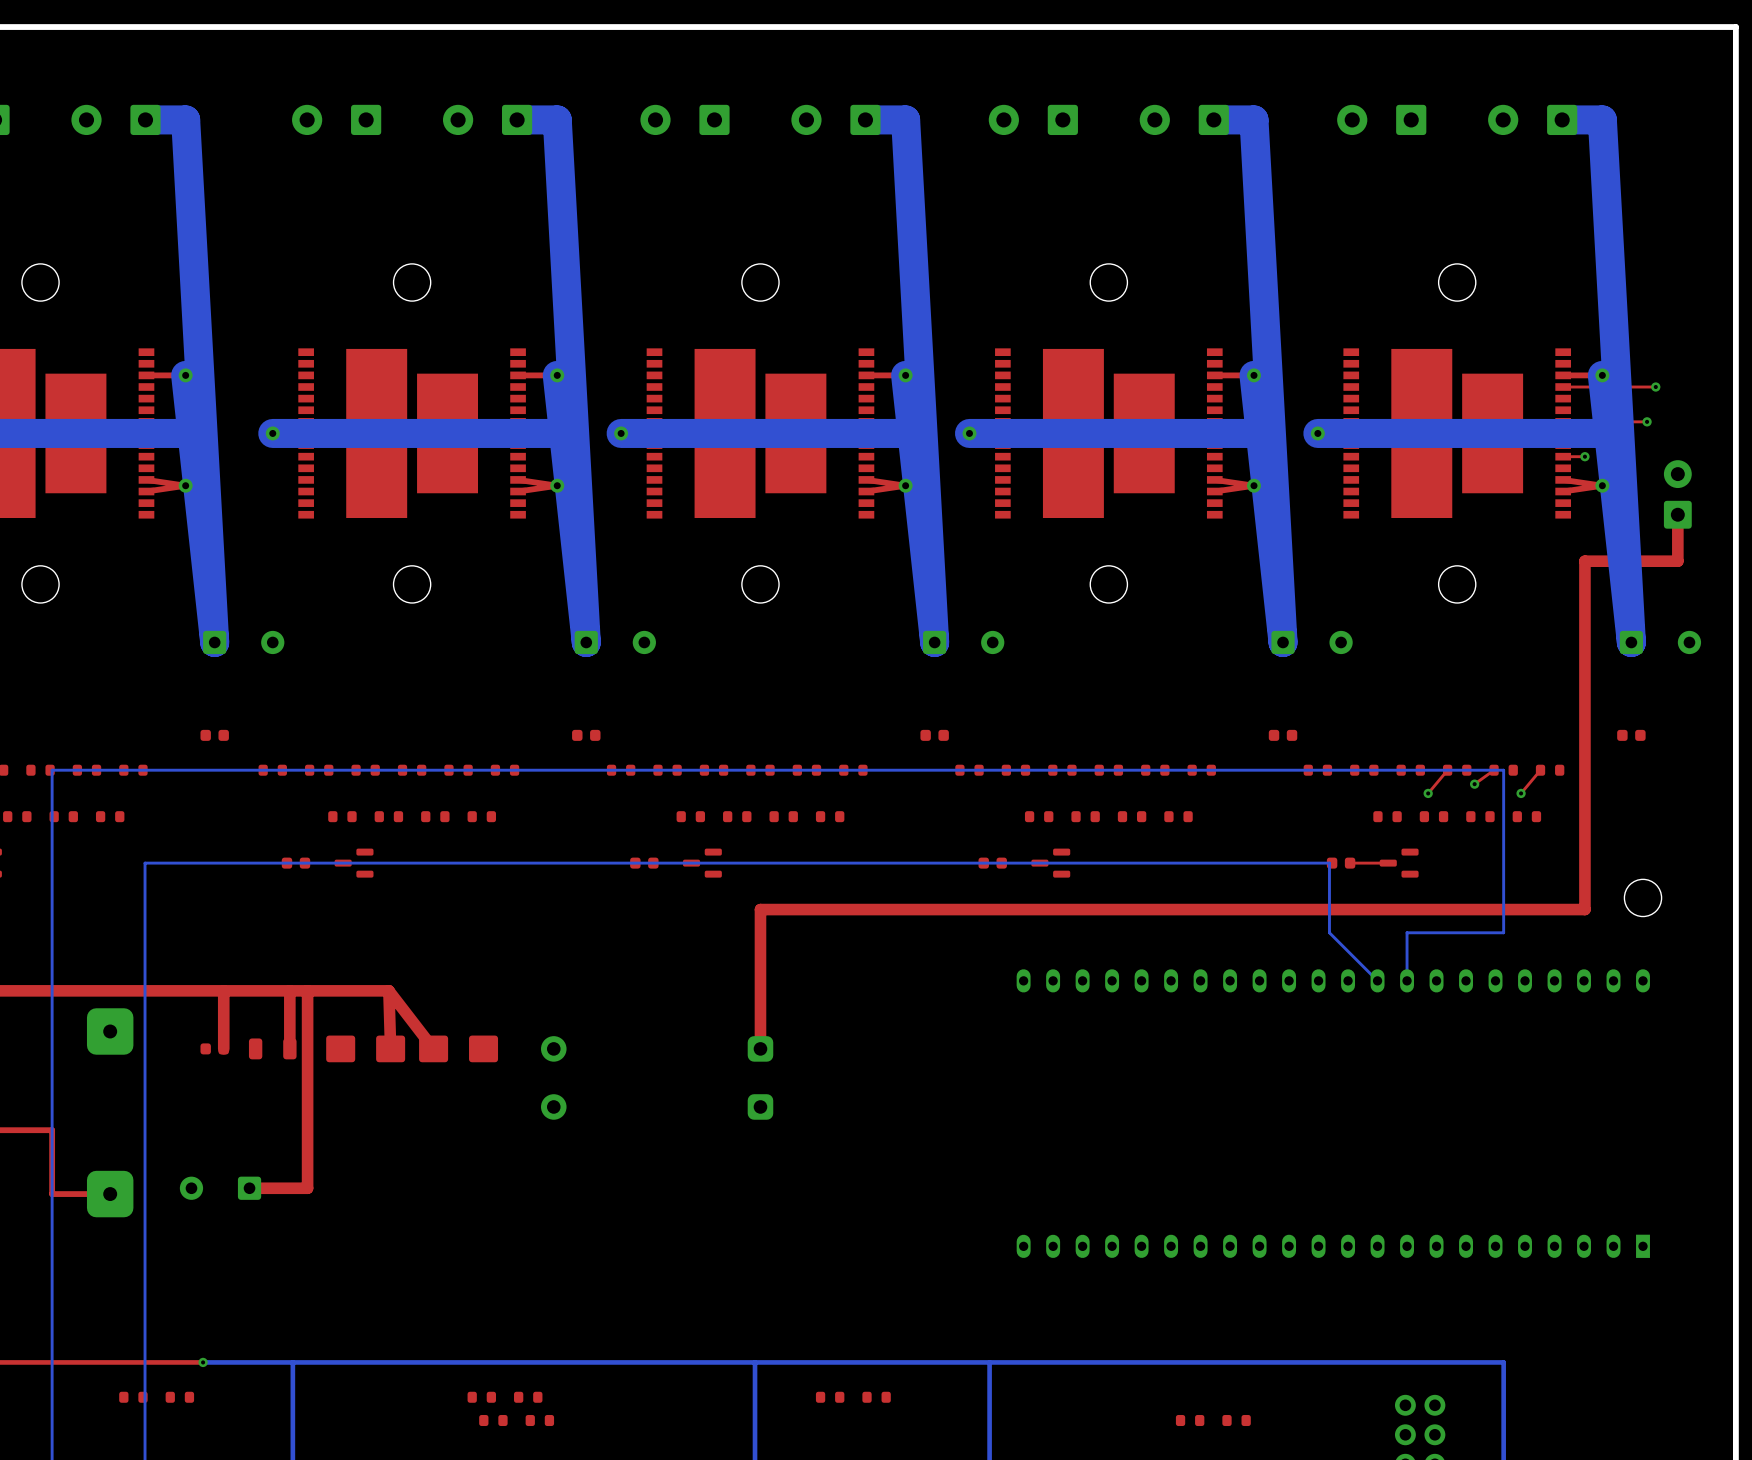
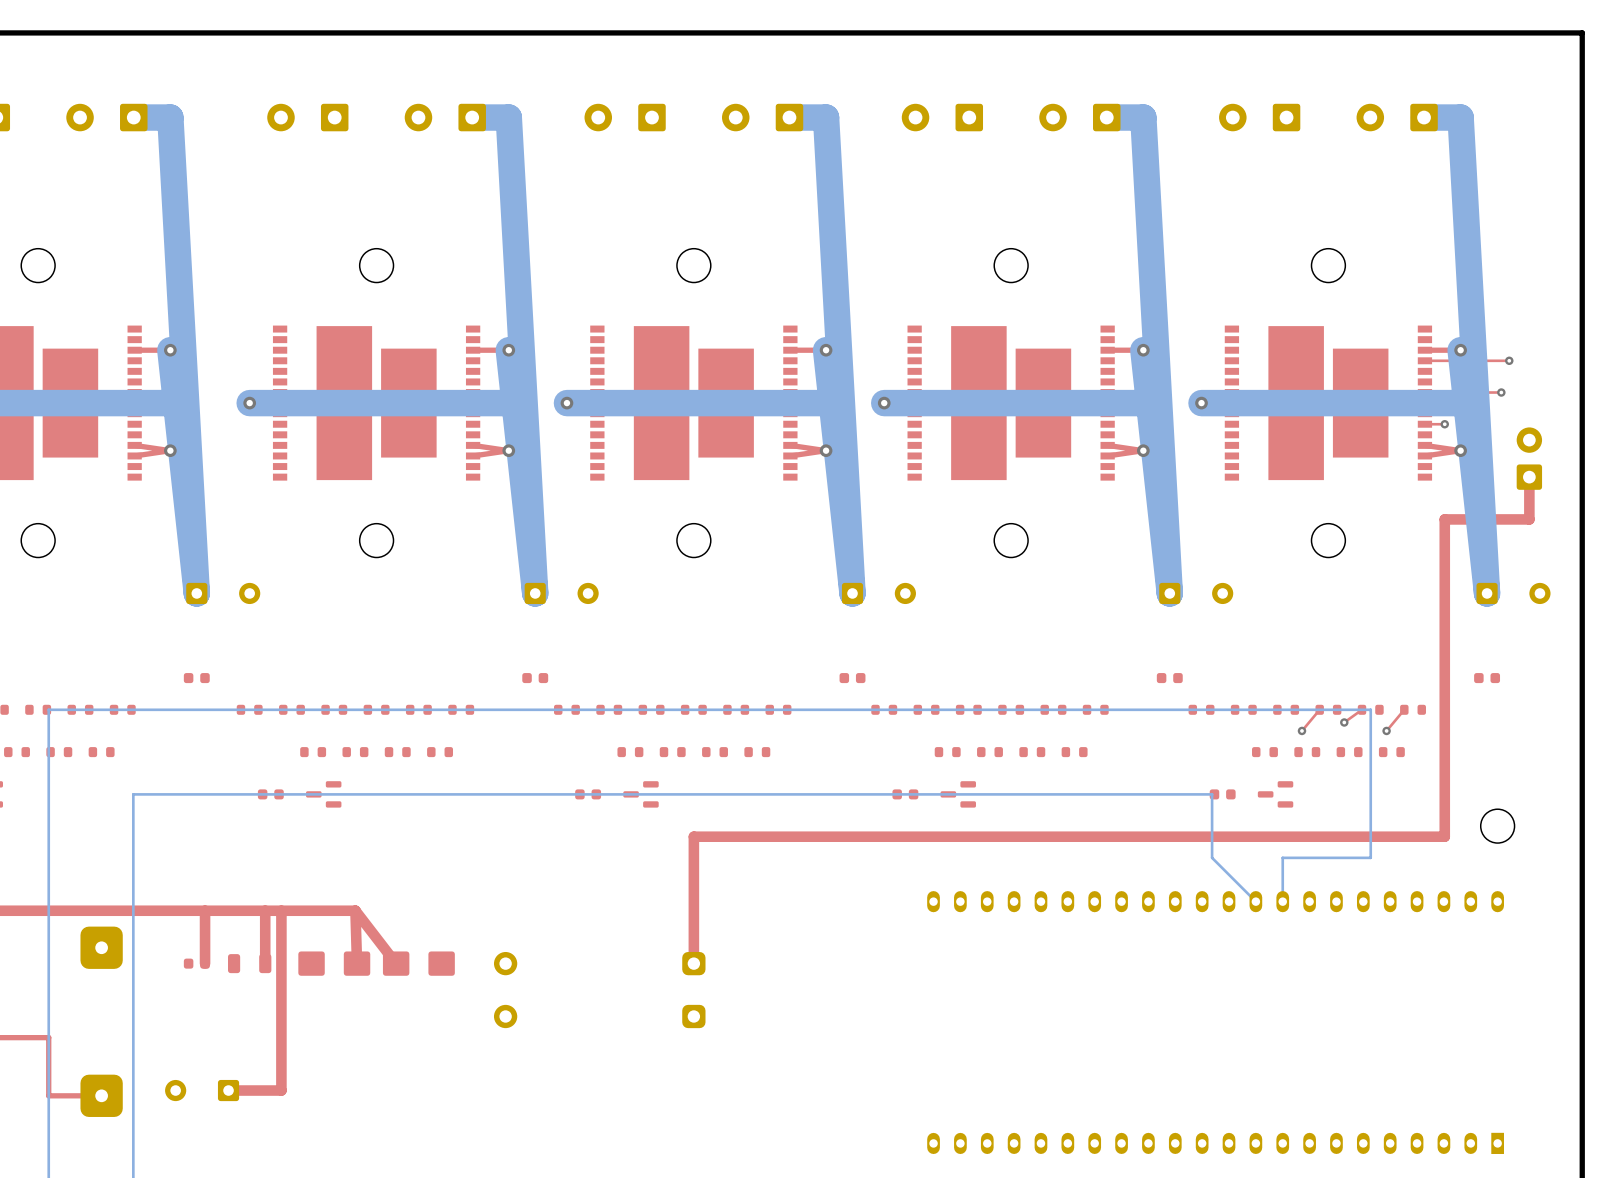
top track: (1388, 863) (1350, 863) -> none

